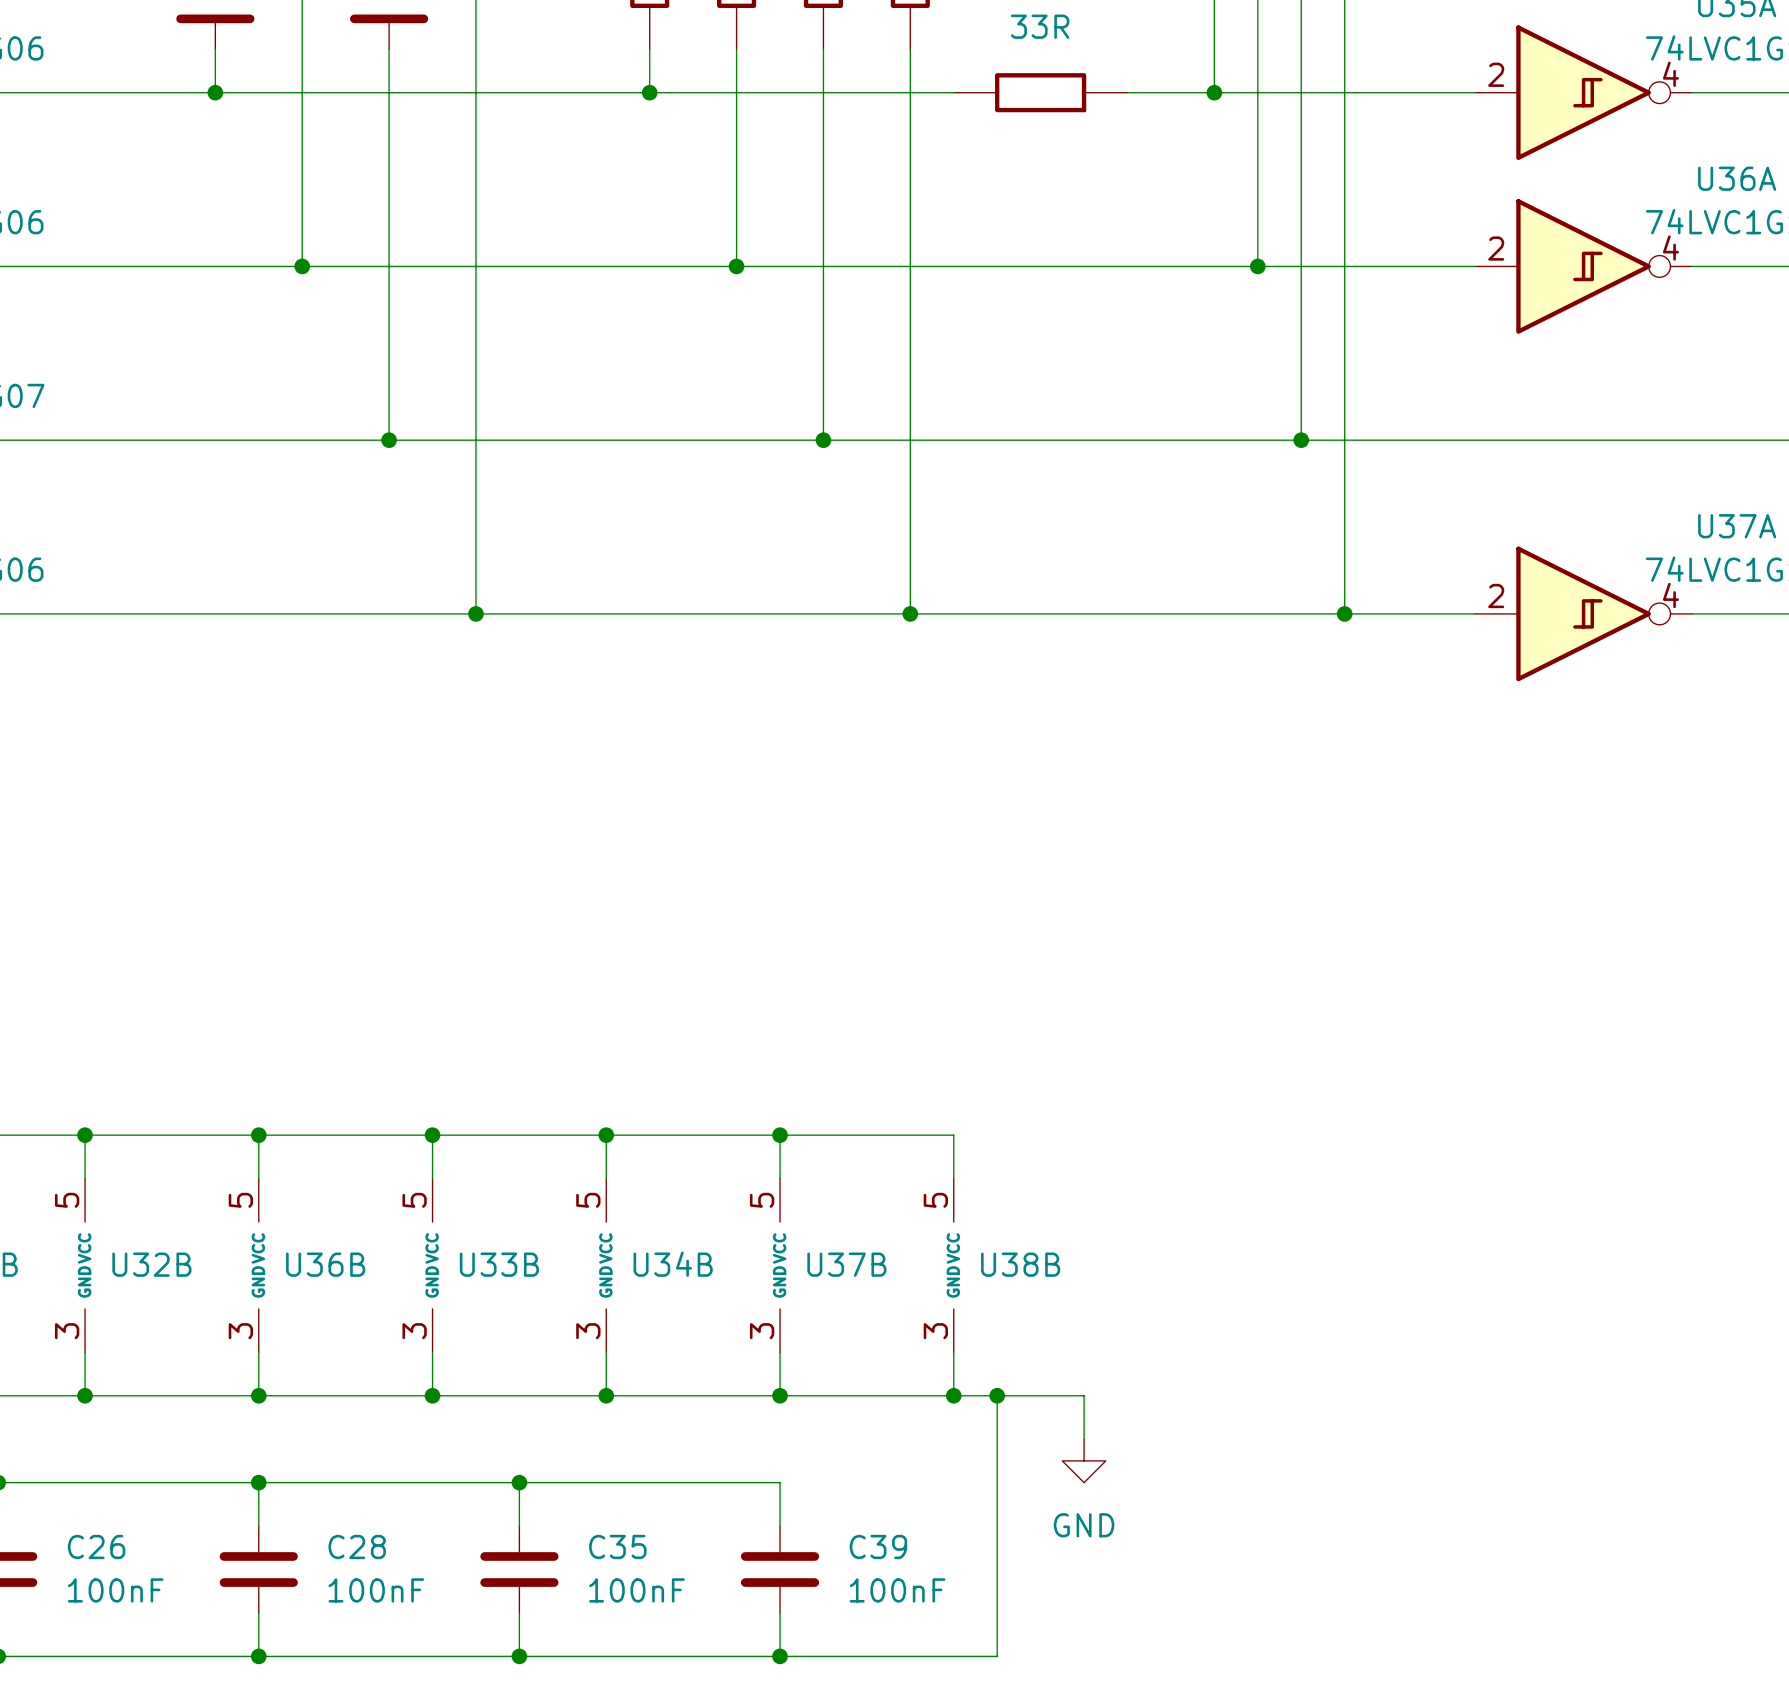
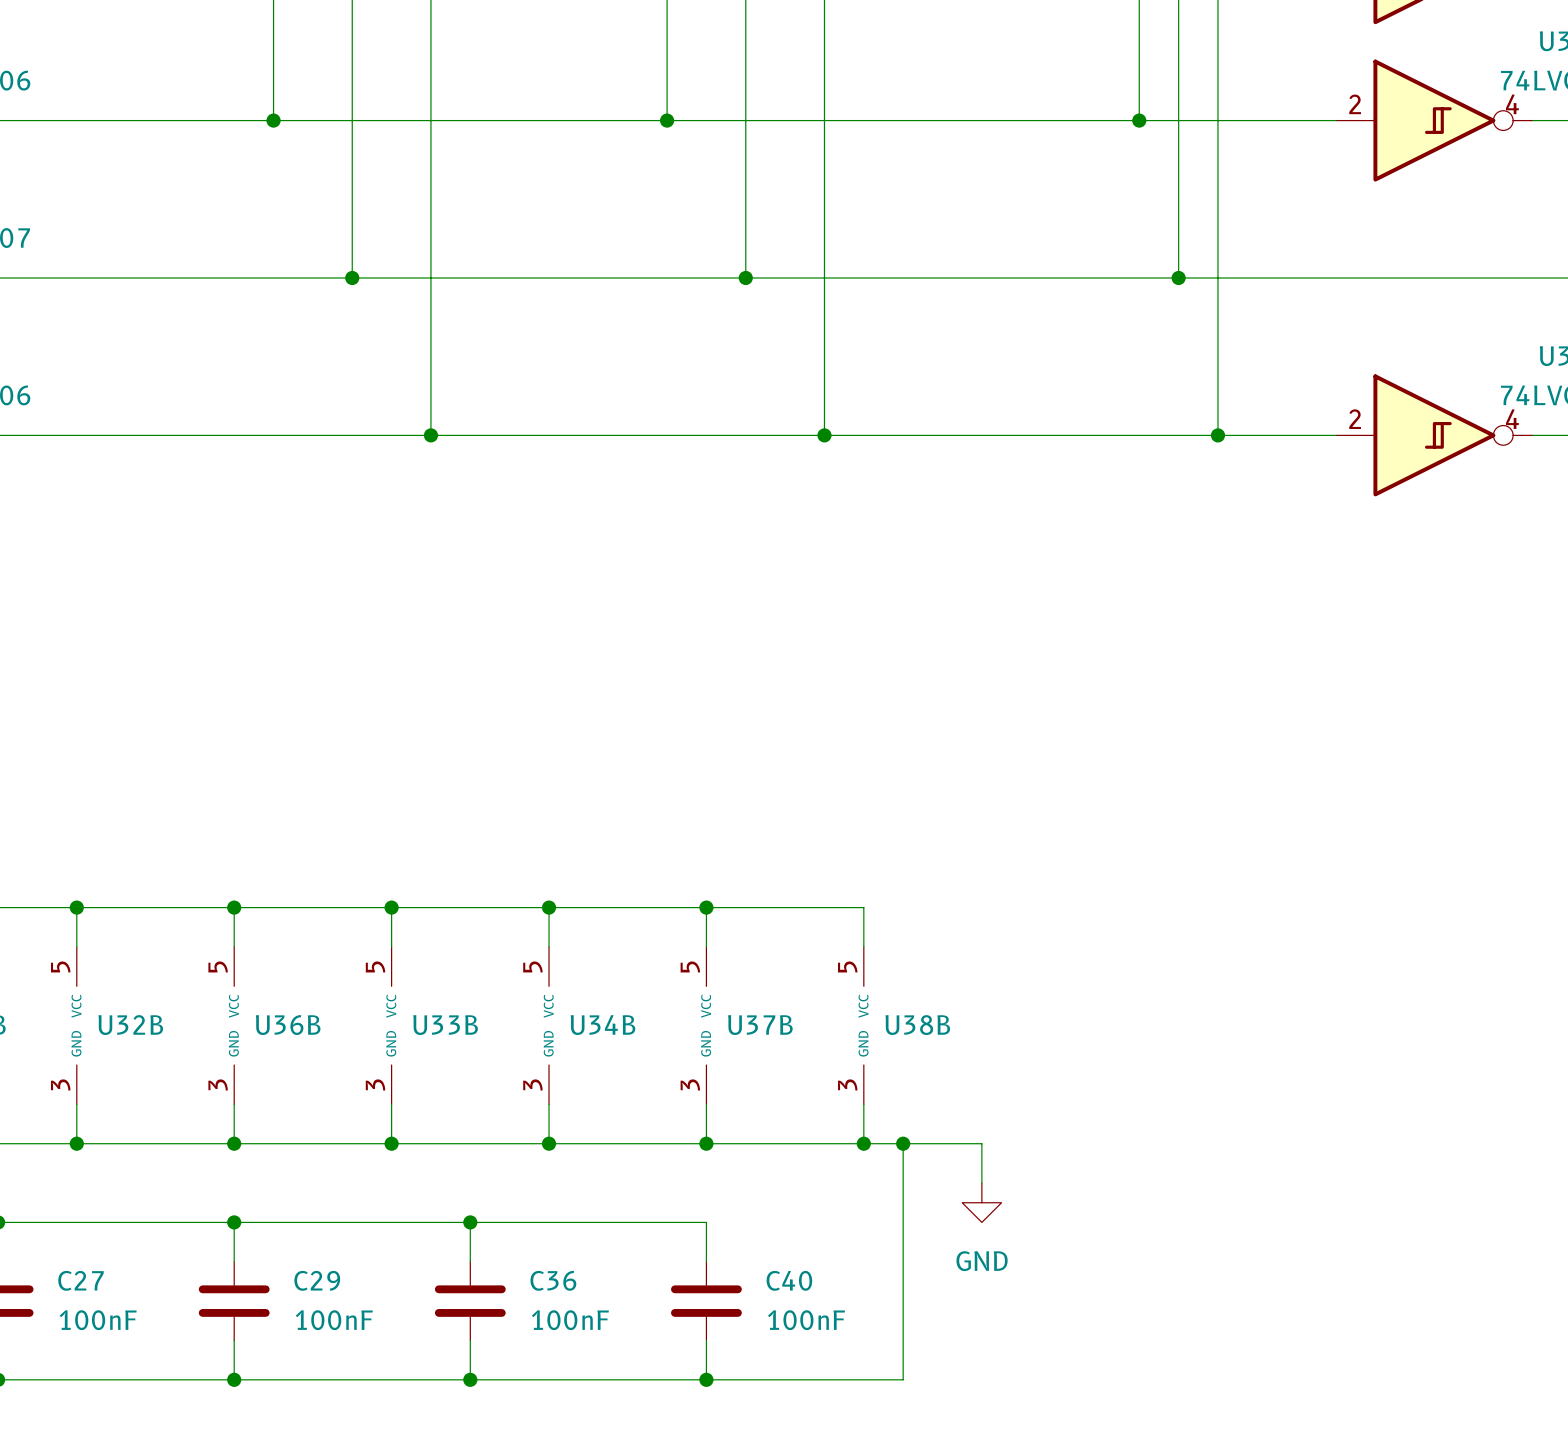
C26 name: C26 (96, 1546) -> C27 (81, 1280)
C28 name: C28 (357, 1546) -> C29 (317, 1280)
C35 name: C35 (617, 1546) -> C36 (553, 1280)
C39 name: C39 (878, 1546) -> C40 (789, 1280)

